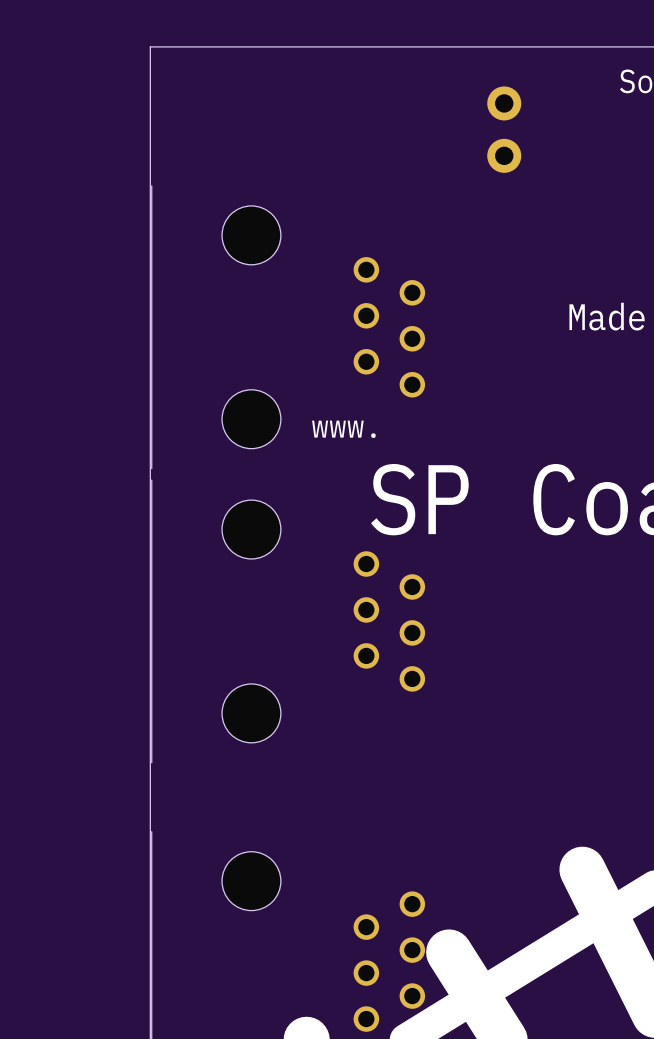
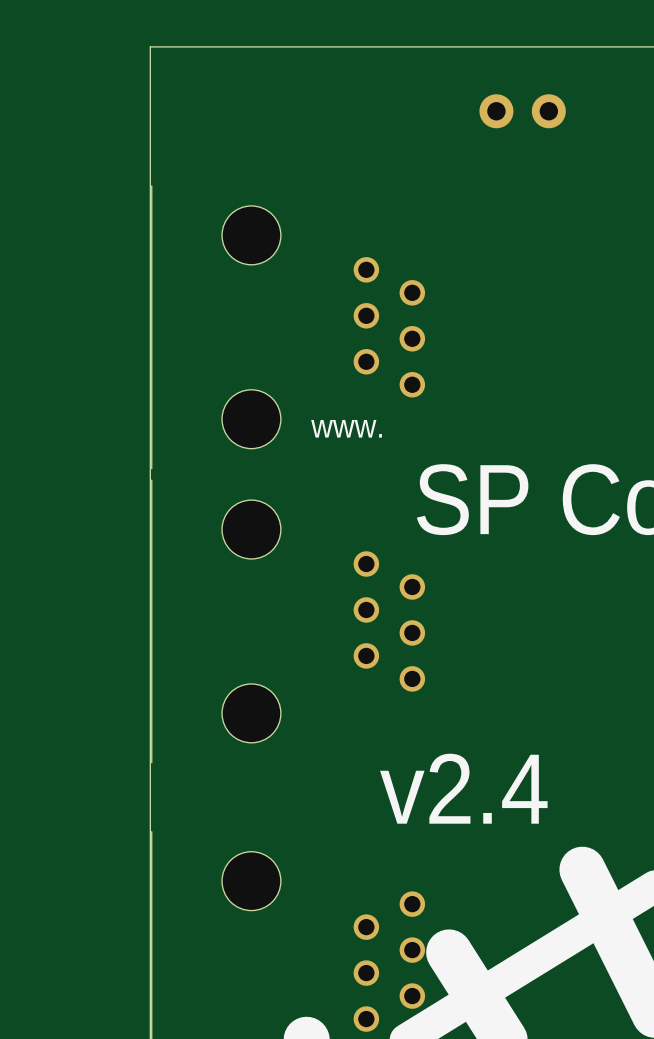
part rotation: 0° (504, 129) -> 90° clockwise (522, 111)
text: none -> v2.4 (463, 788)

